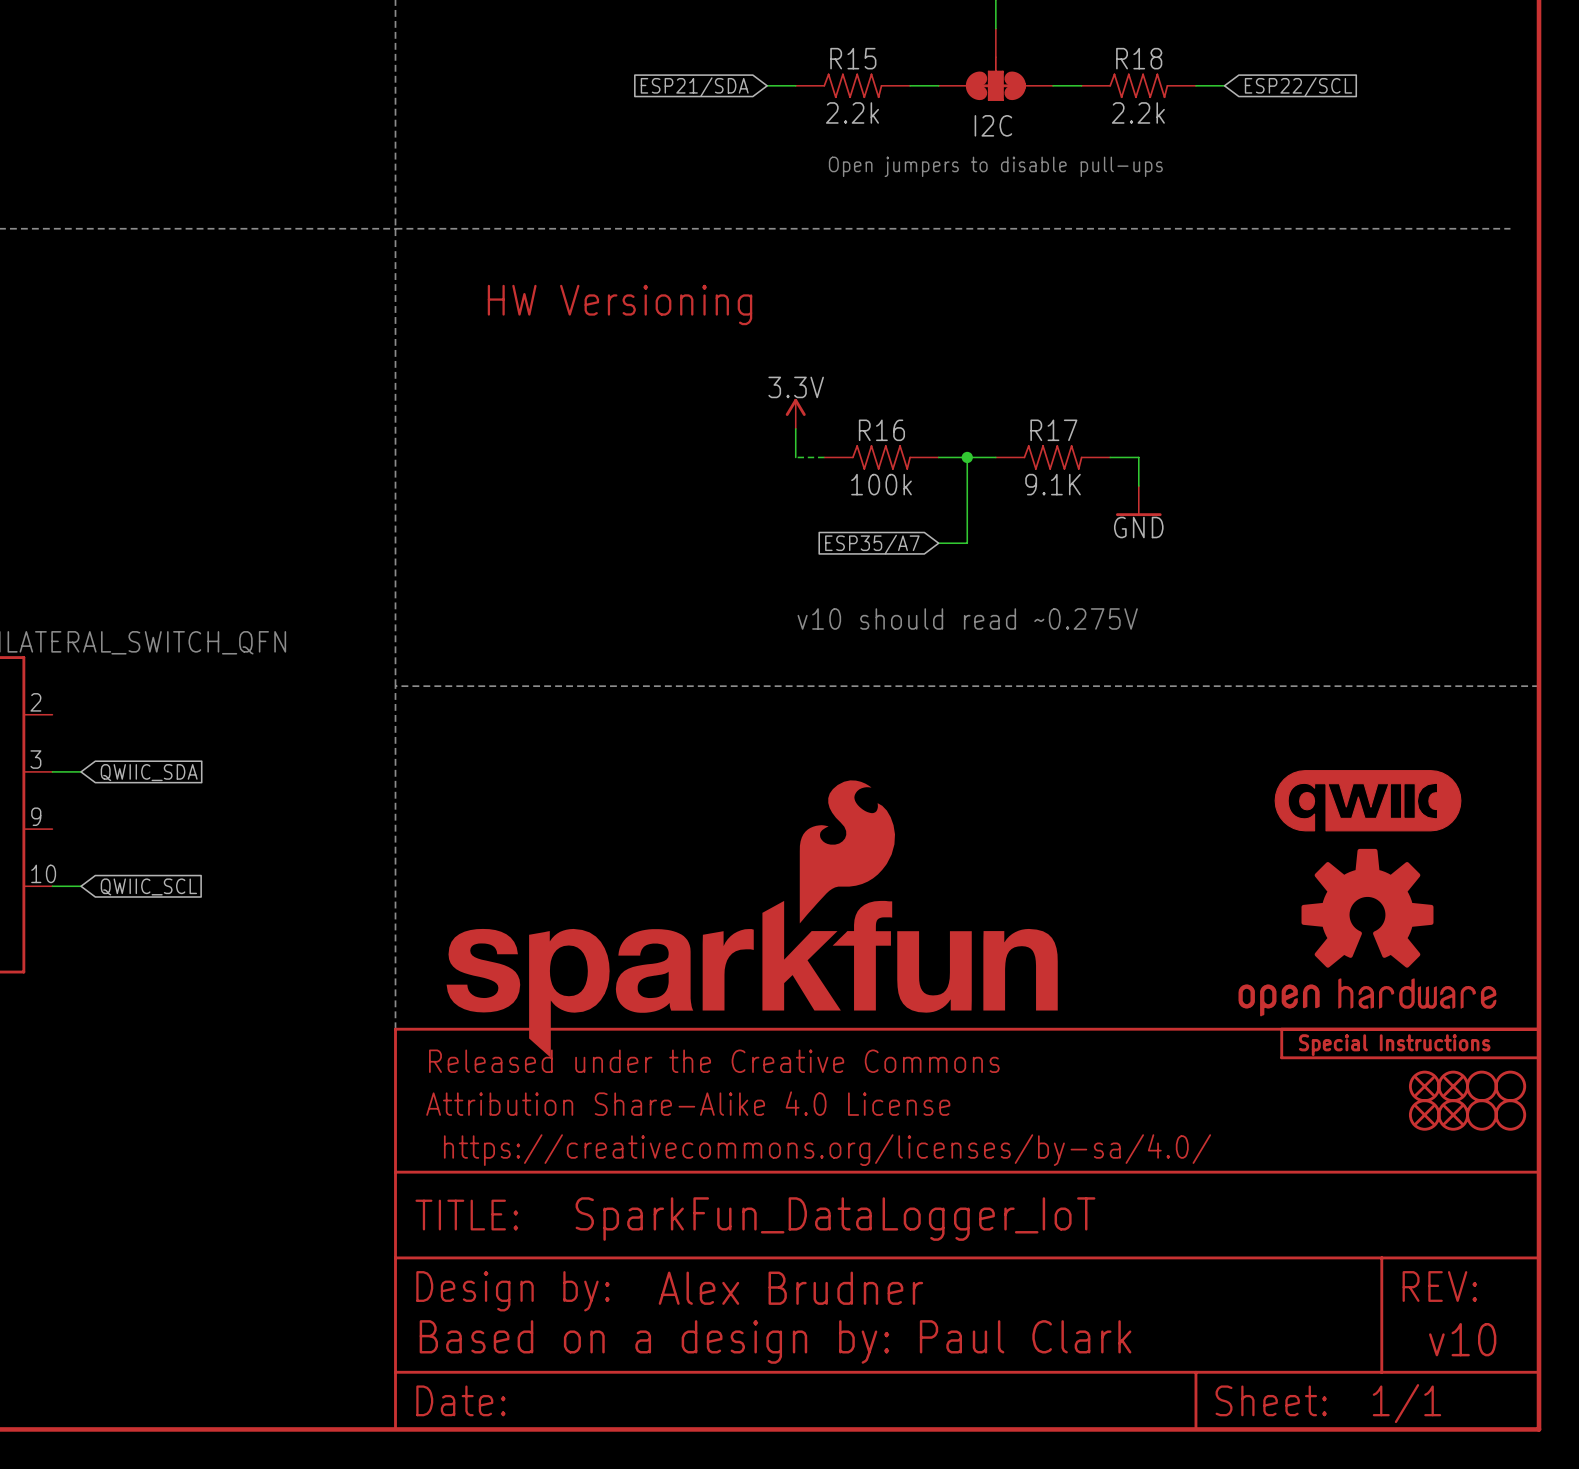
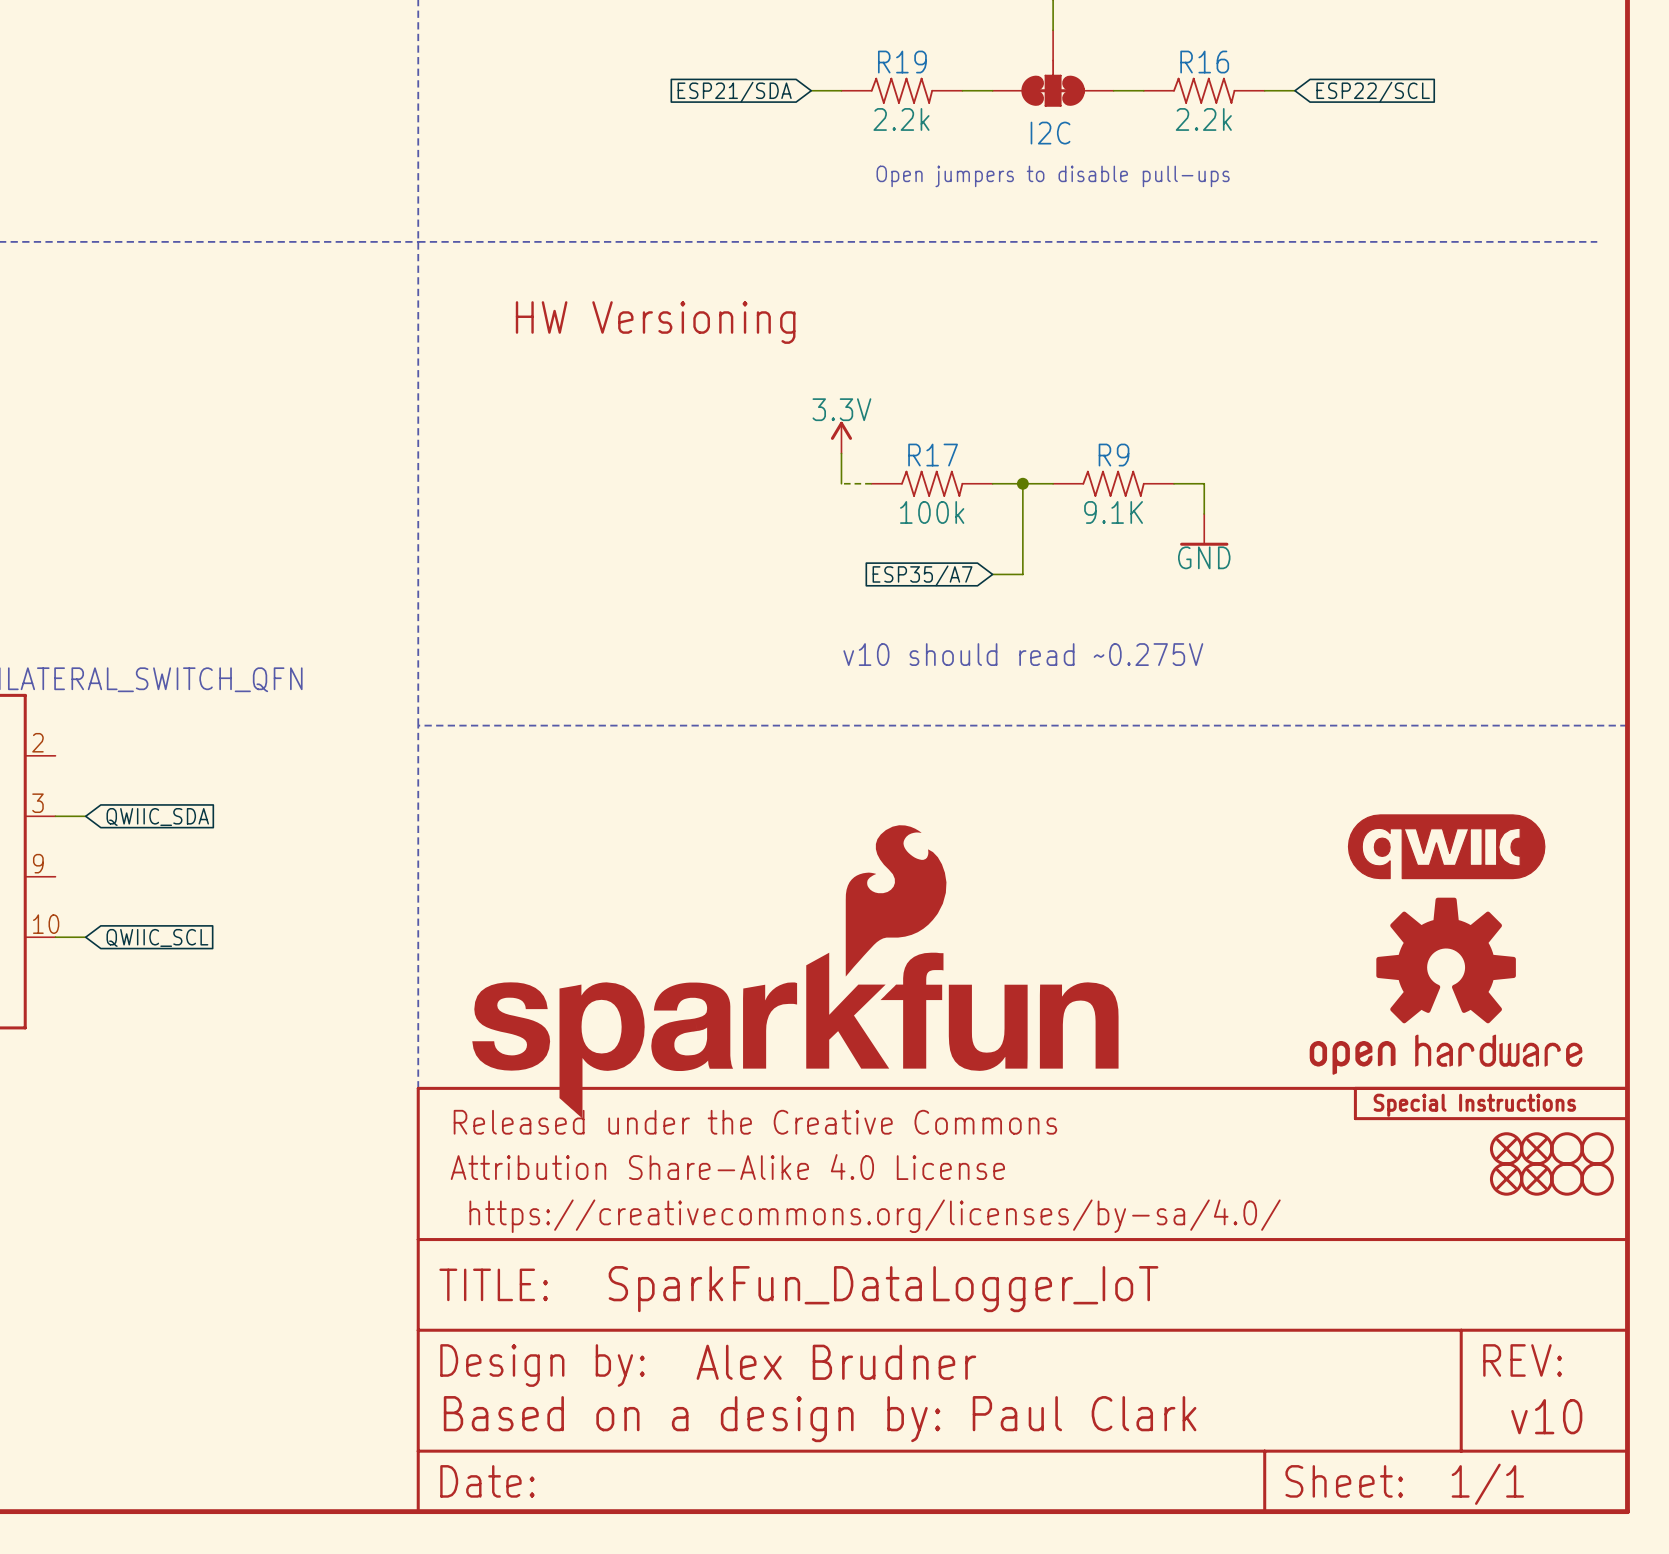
R15 name: R15 (853, 58) -> R19 (902, 62)
R18 name: R18 (1139, 58) -> R16 (1204, 62)
R16 name: R16 (881, 430) -> R17 (933, 455)
R17 name: R17 (1053, 430) -> R9 (1114, 455)

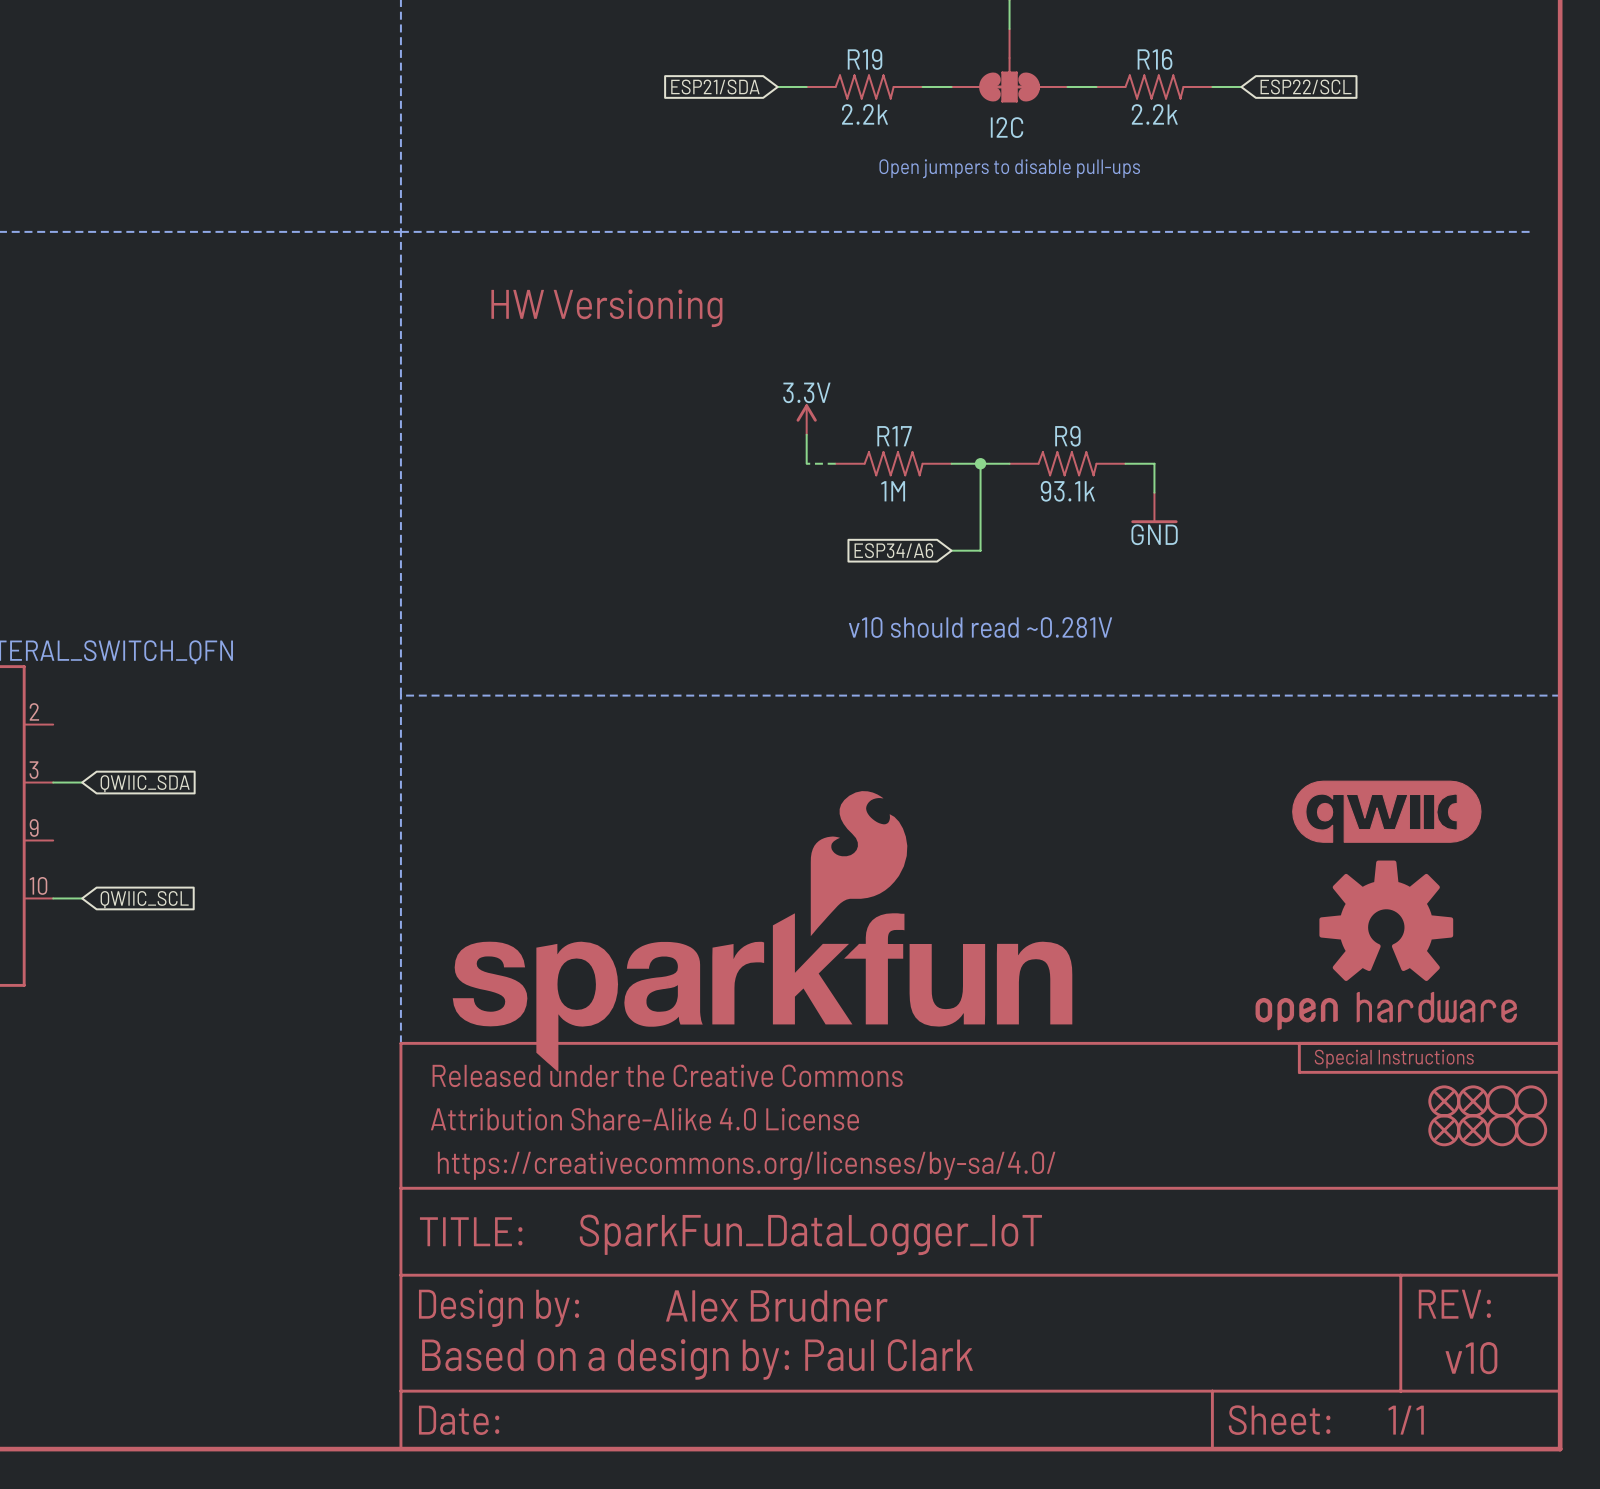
R17 value: 100k (932, 512) -> 1M (893, 491)
R9 value: 9.1K (1113, 512) -> 93.1k (1067, 491)
global label: ESP35/A7 (922, 575) -> ESP34/A6 (893, 550)
text: v10 should read ~0.275V (1023, 654) -> v10 should read ~0.281V (980, 627)

